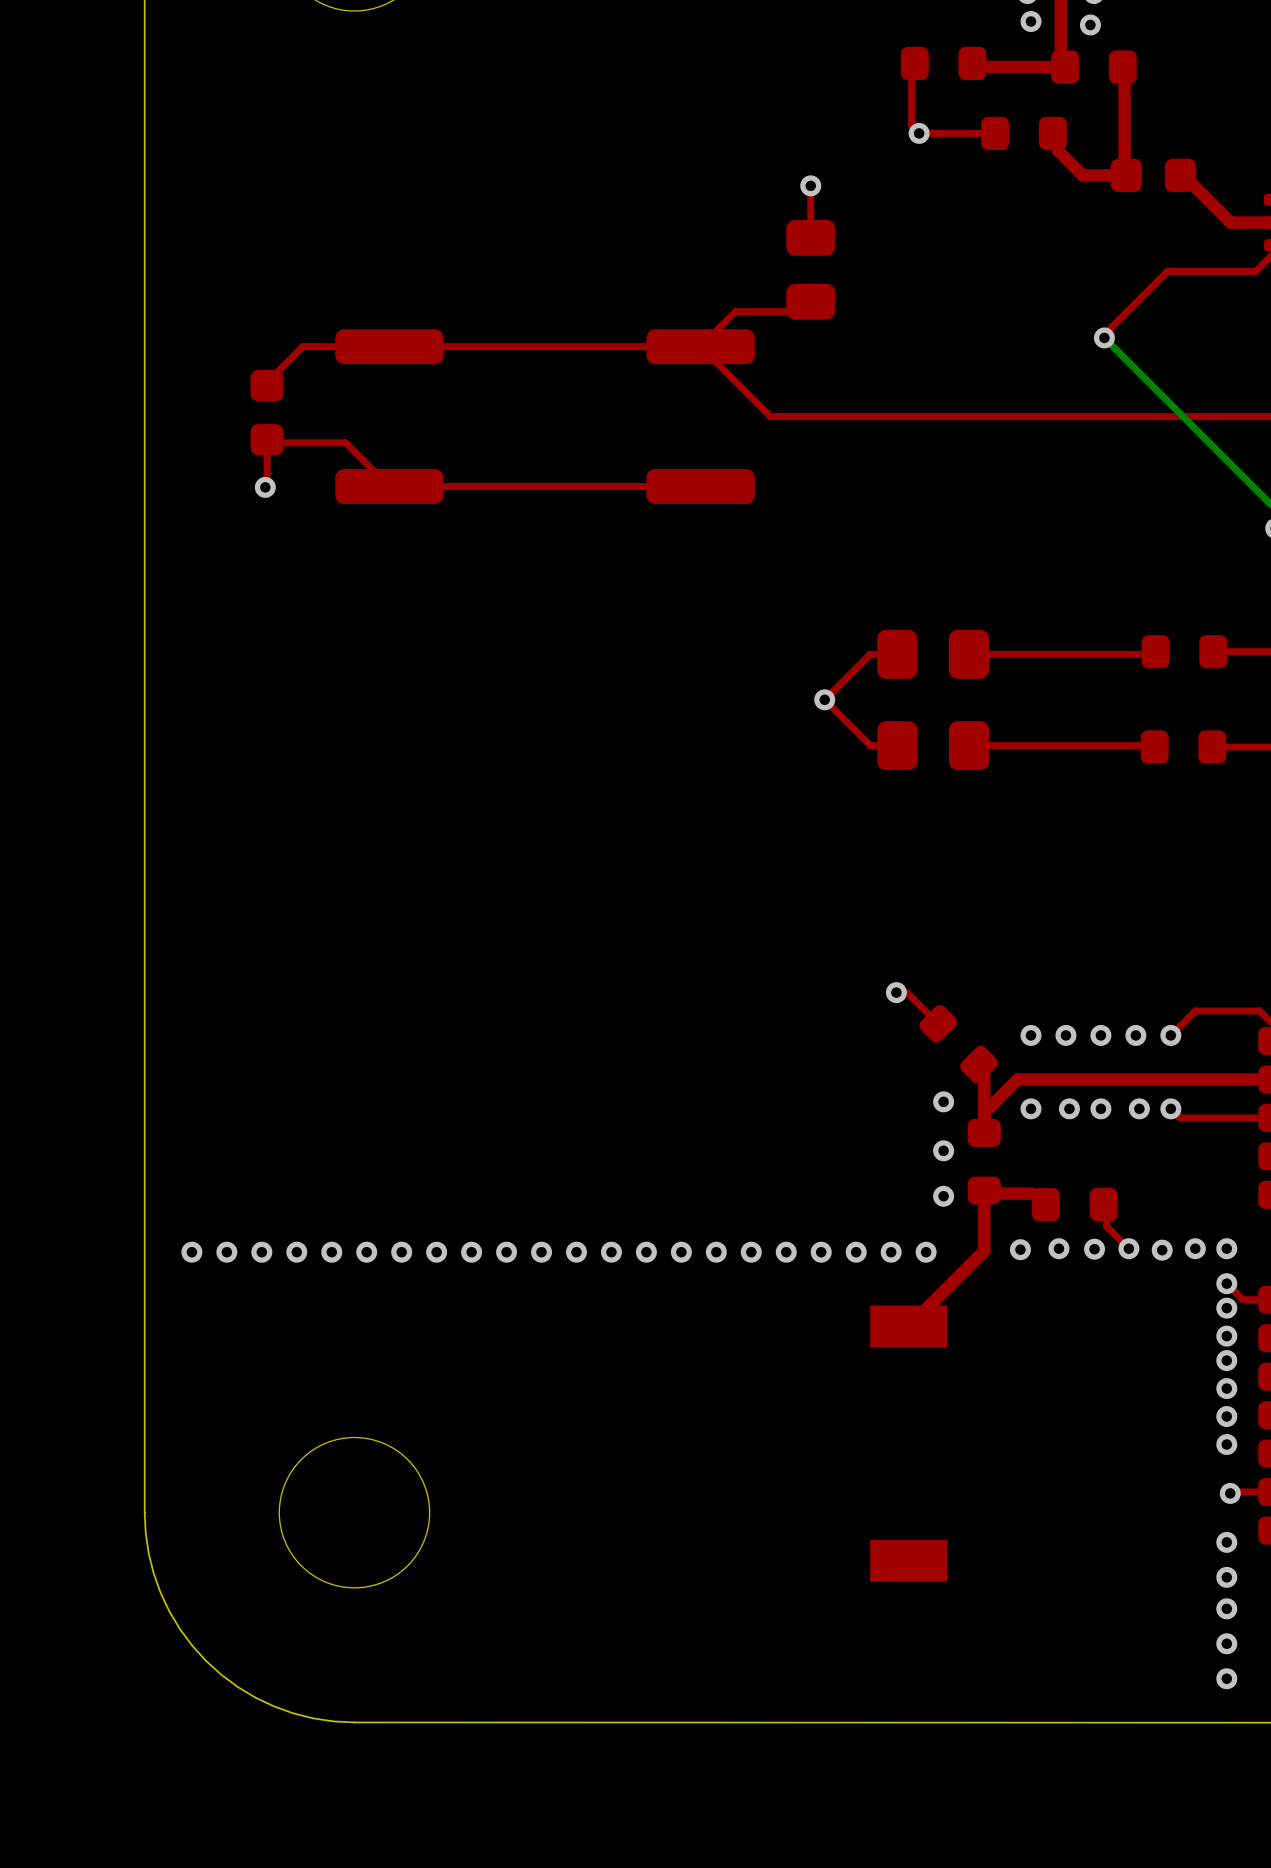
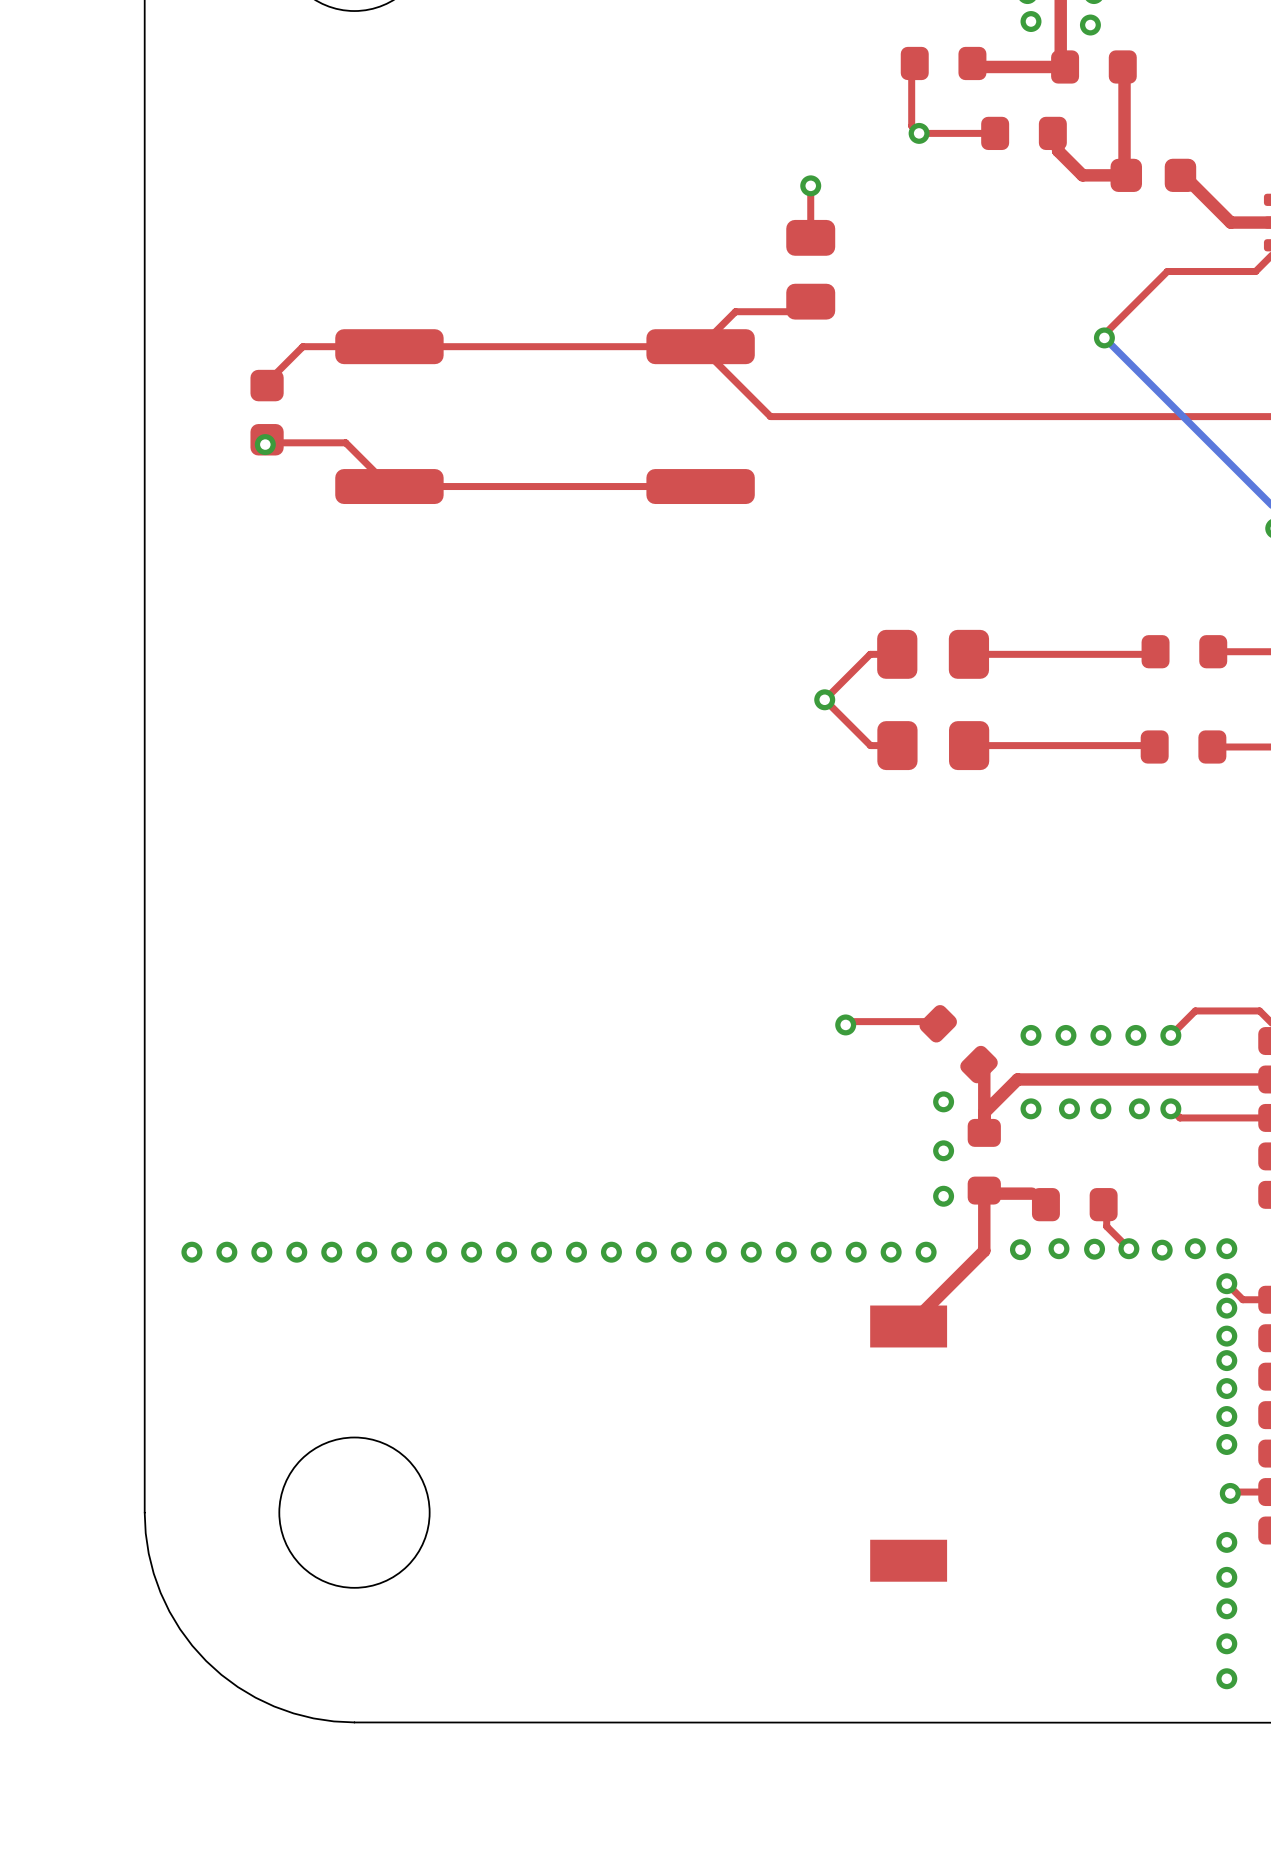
top track: (267, 439) (267, 485) (265, 487) -> none
via position: (265, 487) -> (265, 444)
top track: (896, 992) (907, 992) (938, 1023) -> none
via position: (896, 992) -> (845, 1024)
top track: none -> (936, 1021) (849, 1021) (845, 1024)

